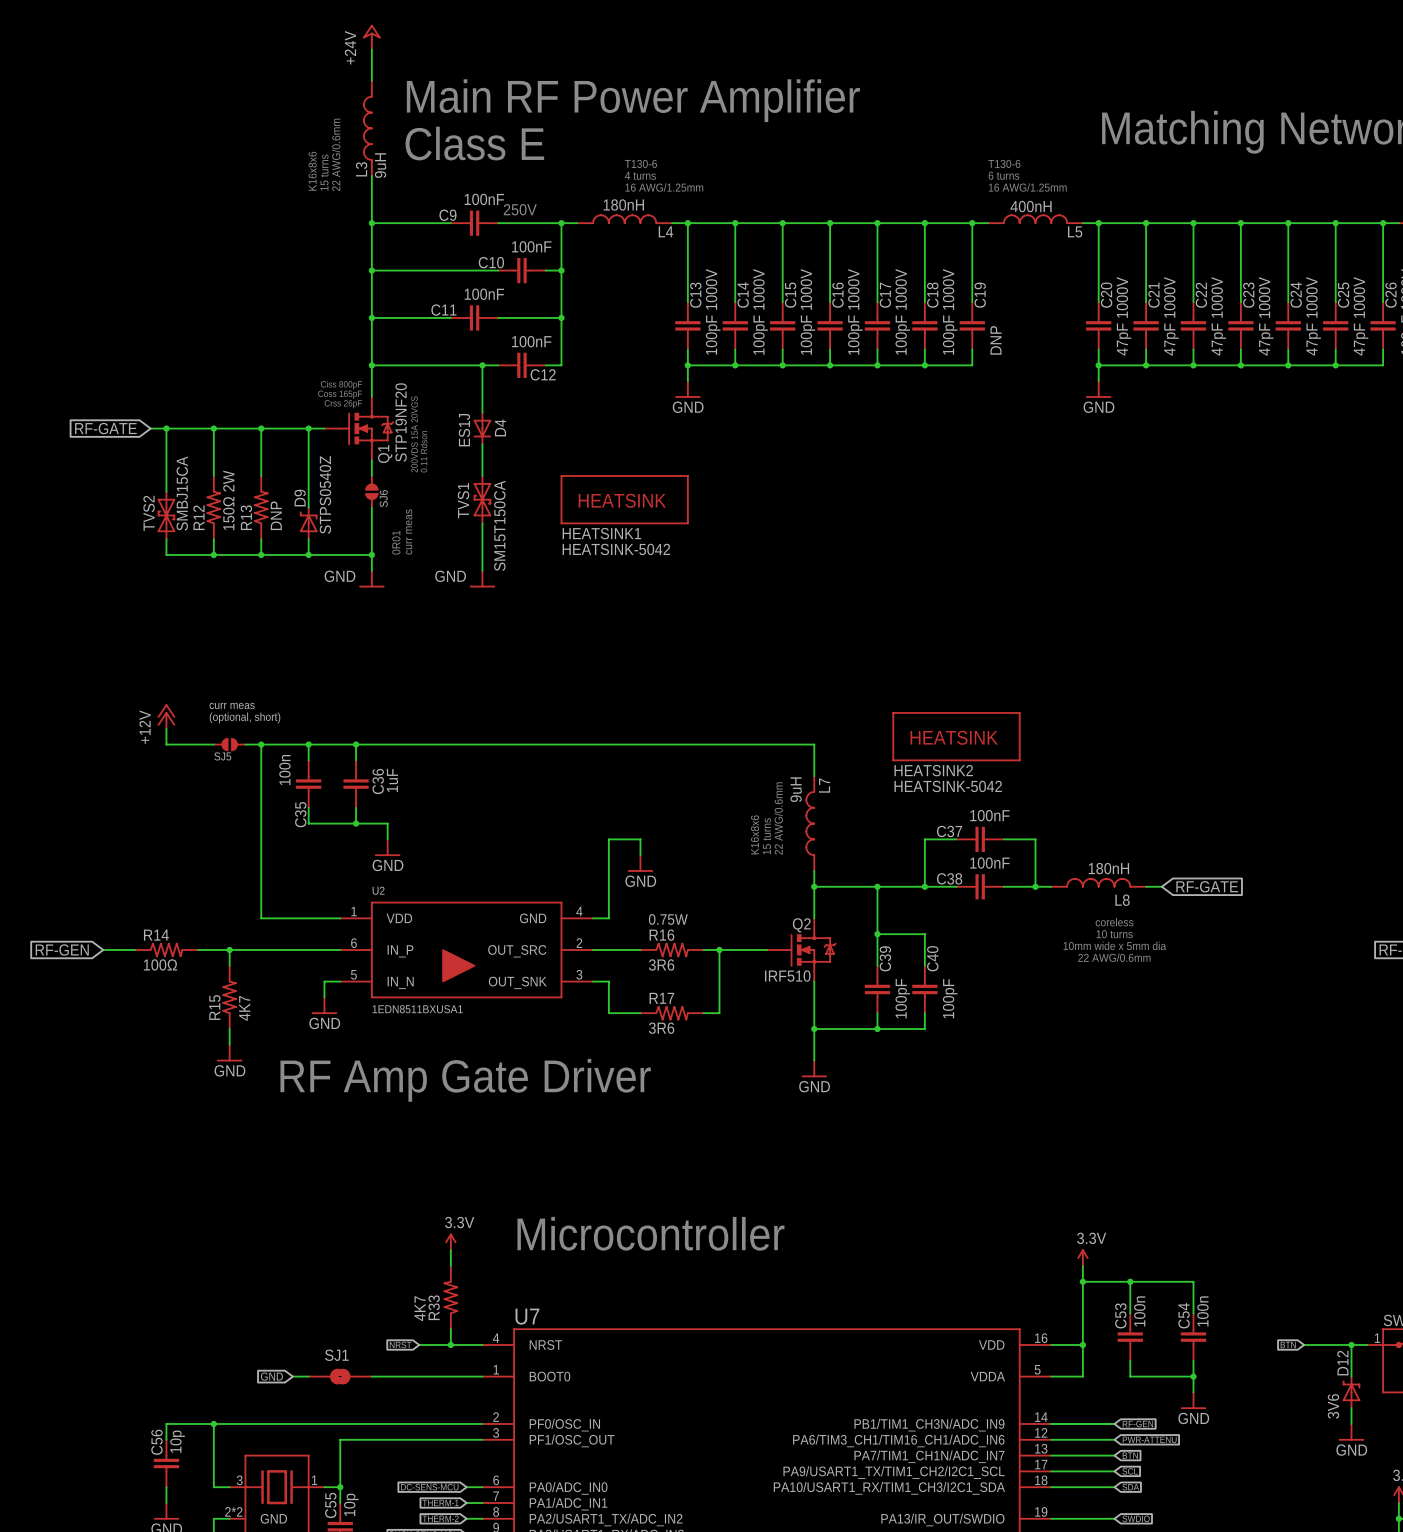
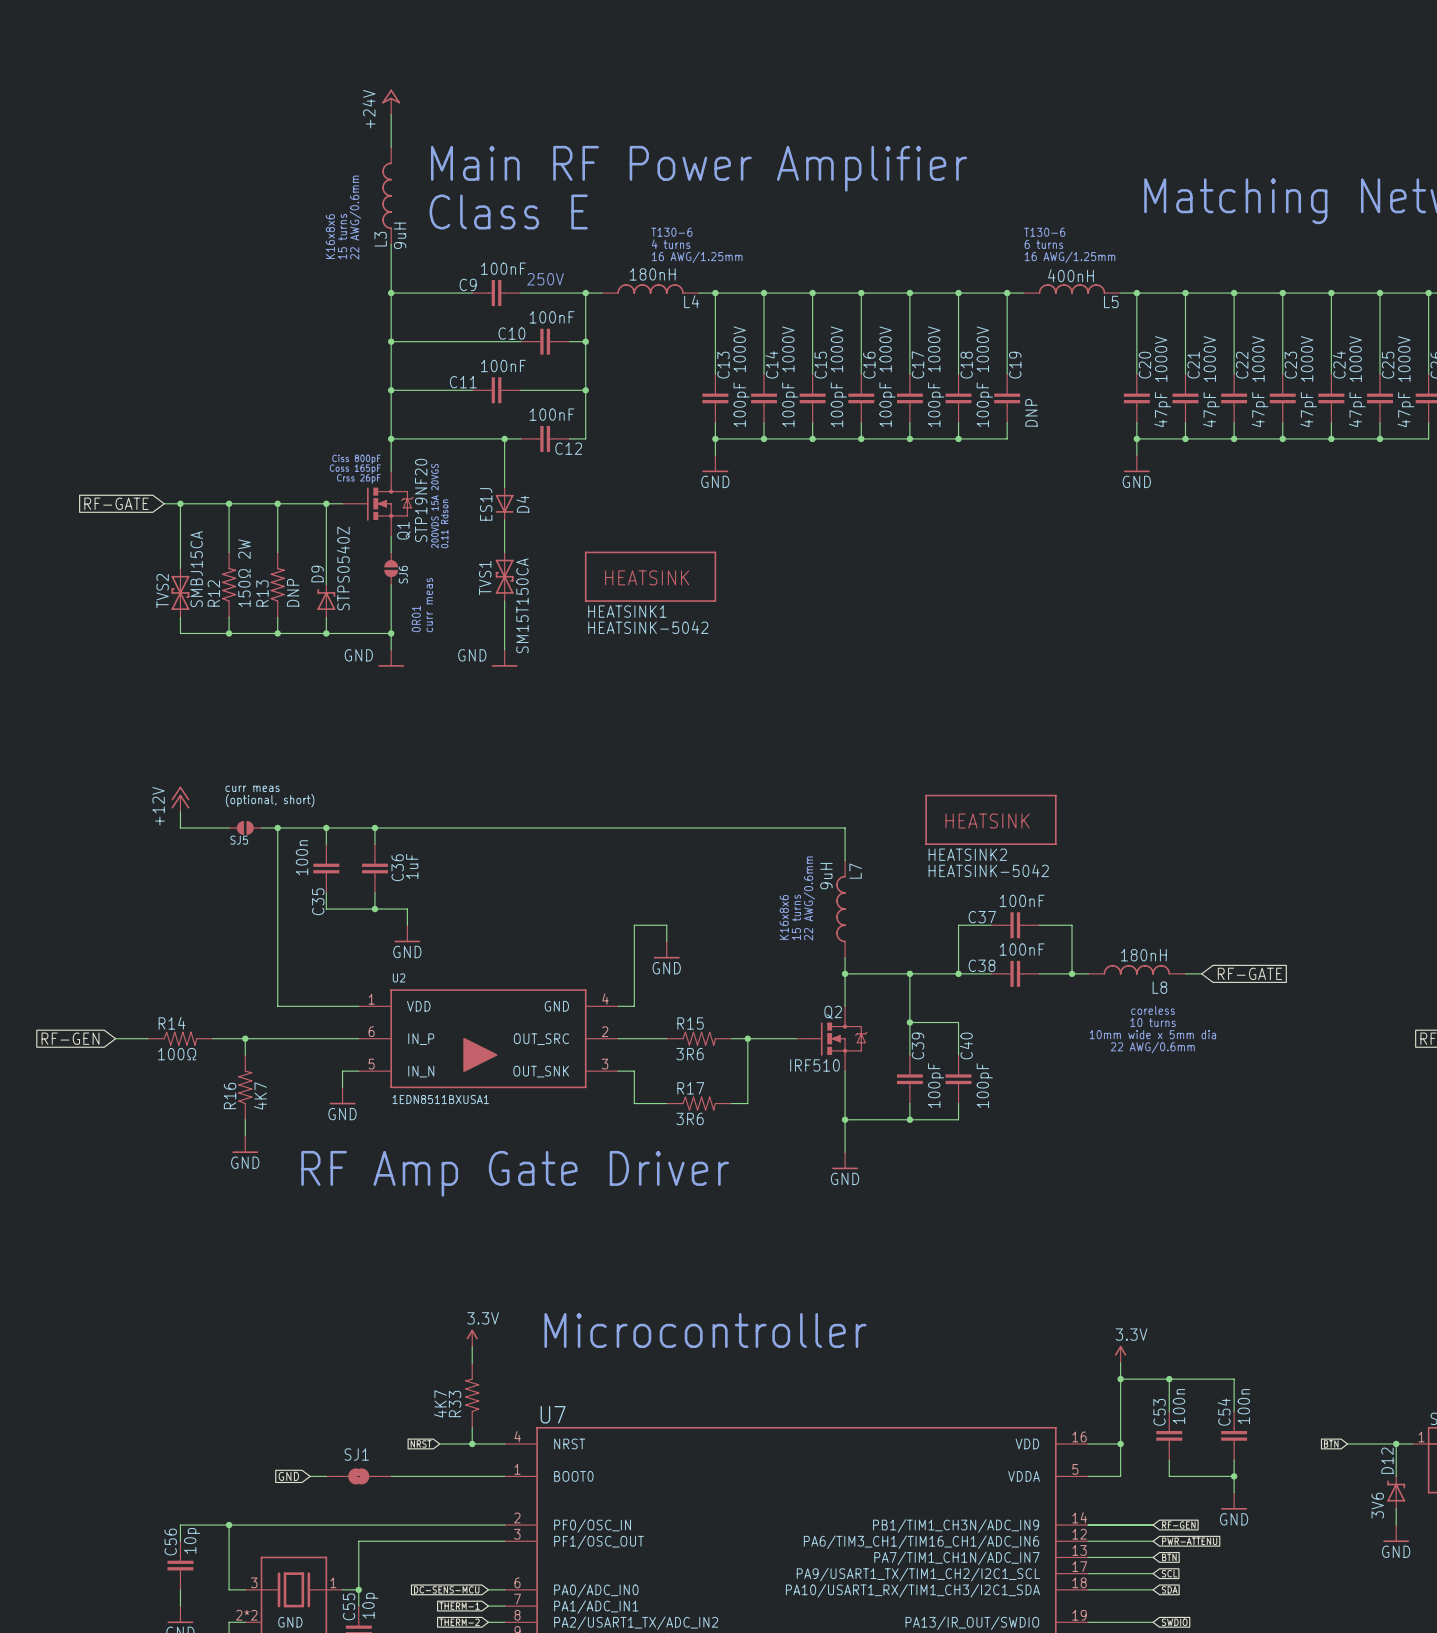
text: 0.75W (668, 919) -> none
R16 name: R16 (661, 935) -> R15 (690, 1023)
R15 name: R15 (214, 1007) -> R16 (230, 1095)

